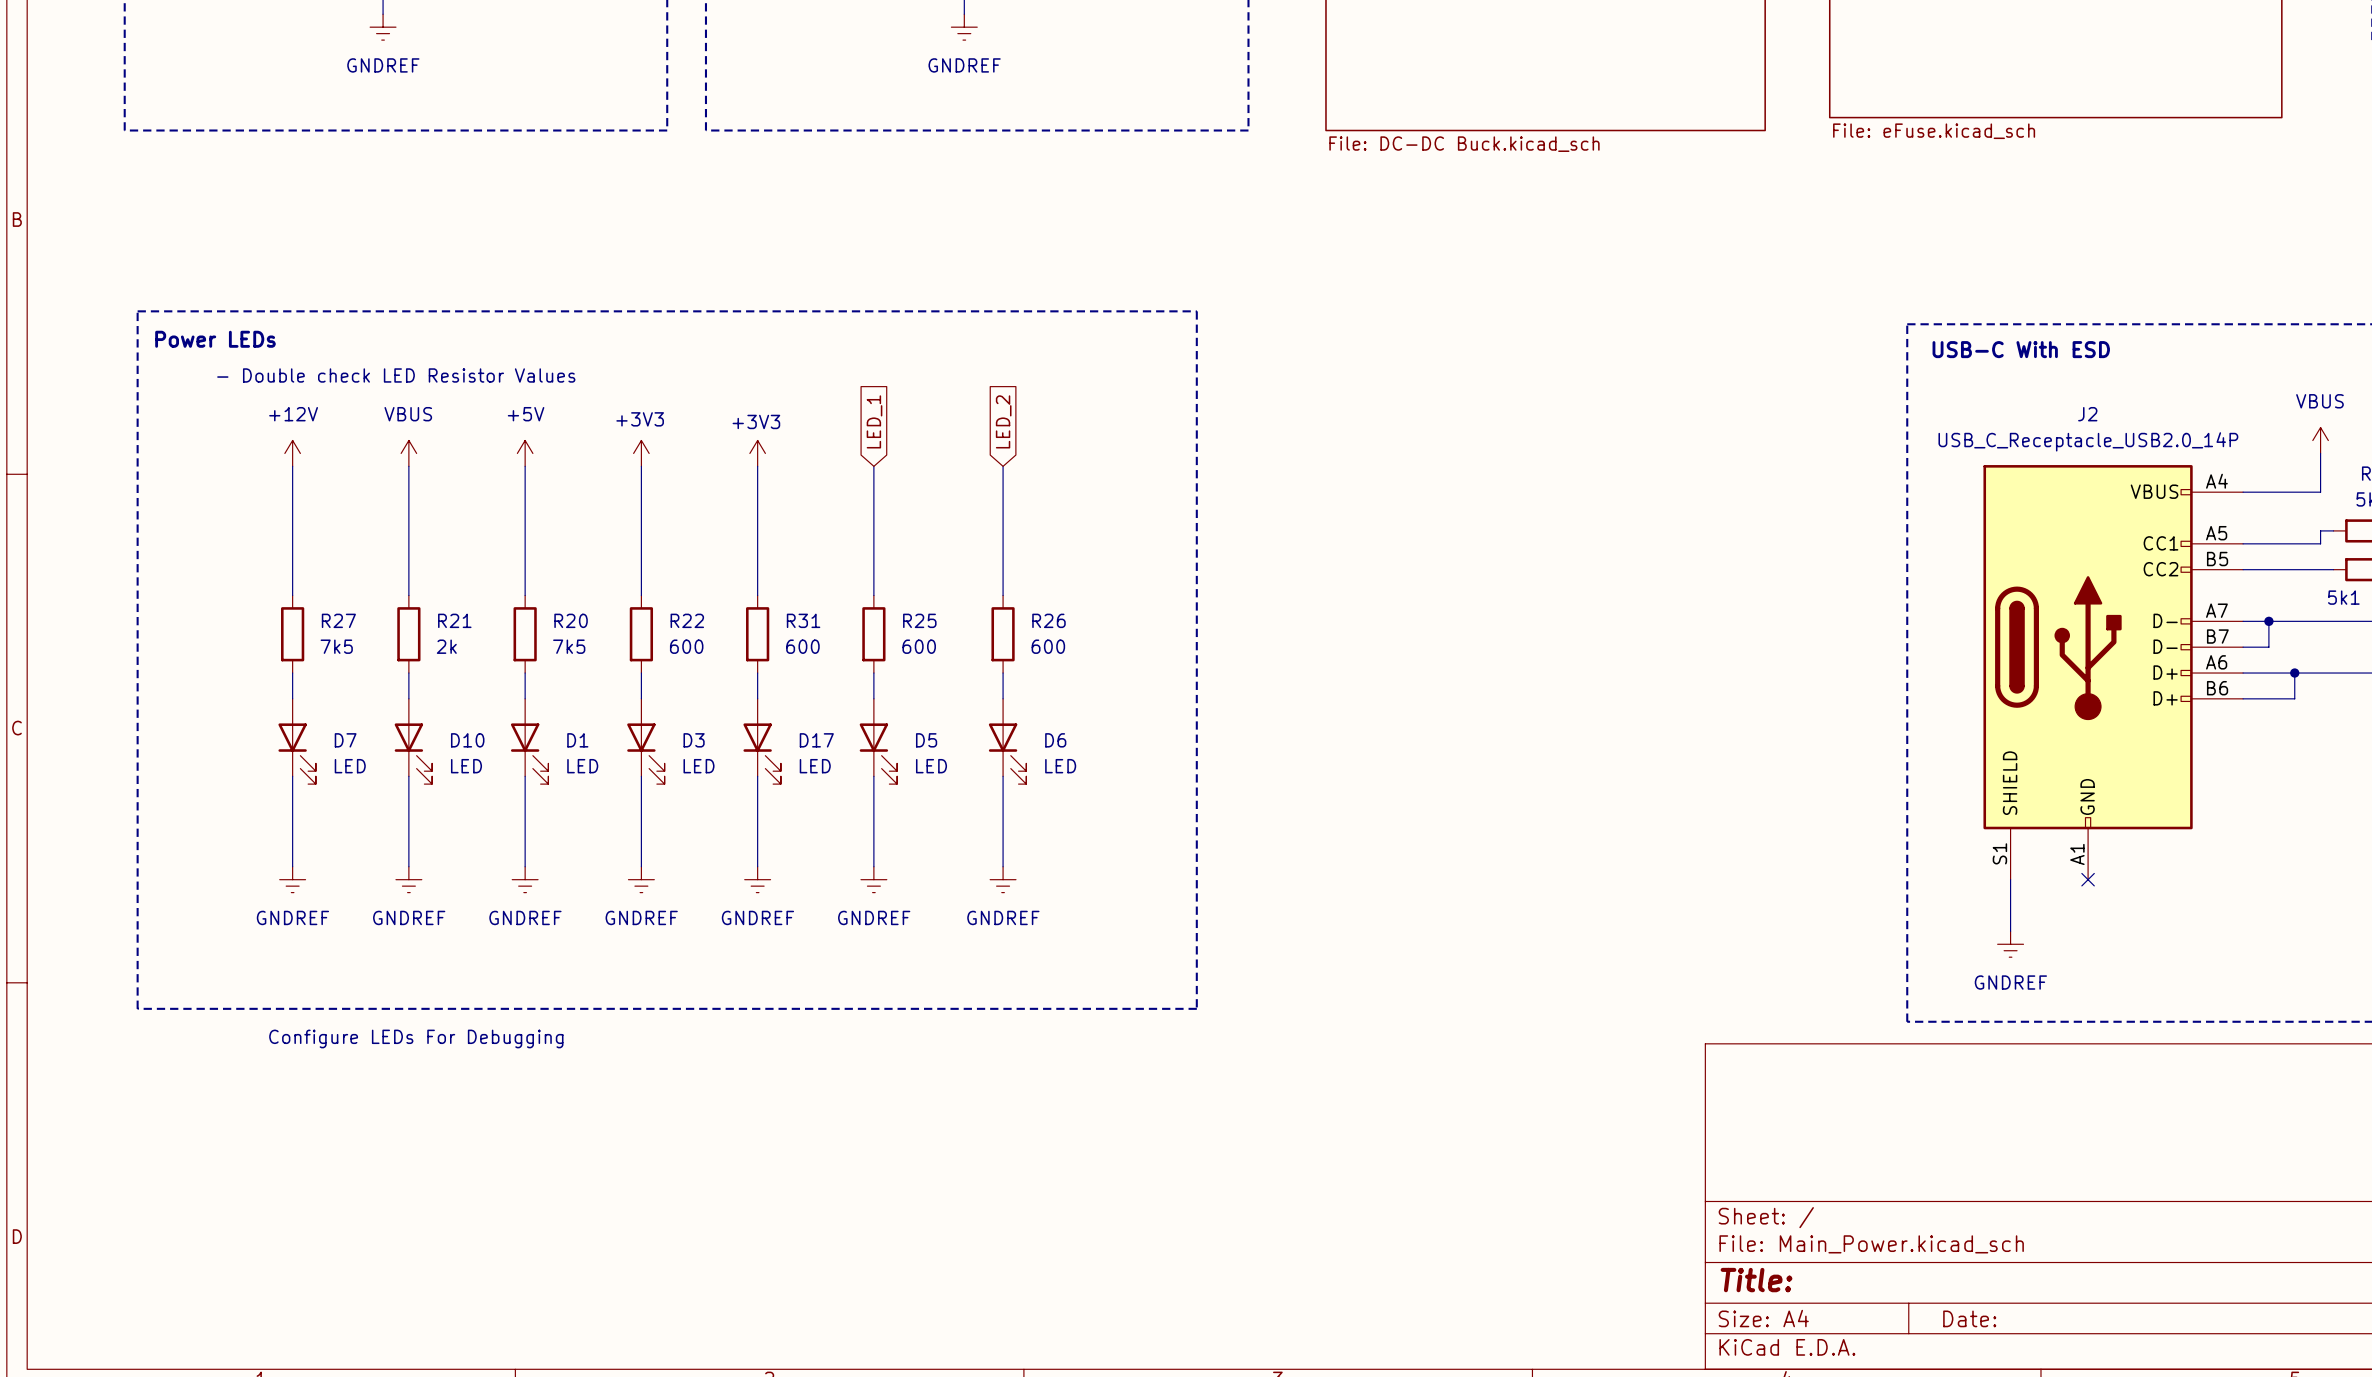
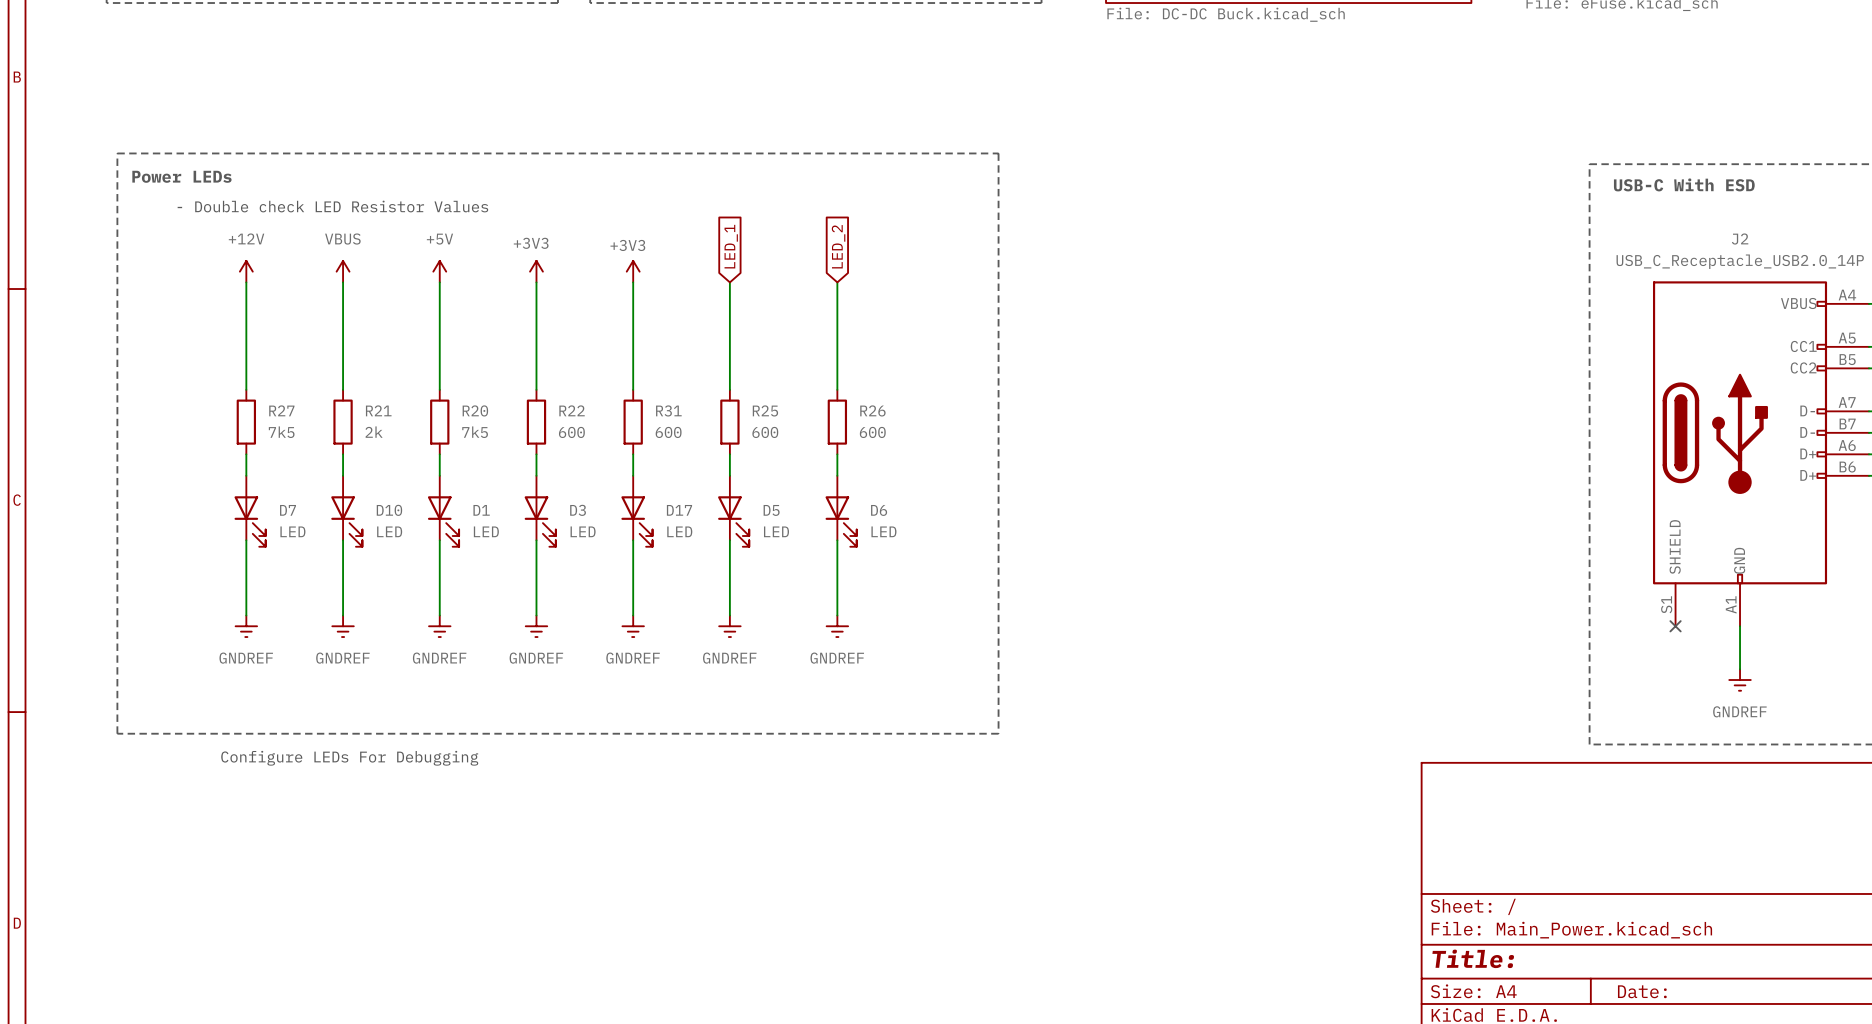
wire: (2010, 879) (2010, 931) -> (1740, 626) (1740, 669)
no-connect mark: none -> (1675, 626)
no-connect mark: (2088, 879) -> none
power symbol position: GNDREF (2010, 944) -> GNDREF (1740, 680)

